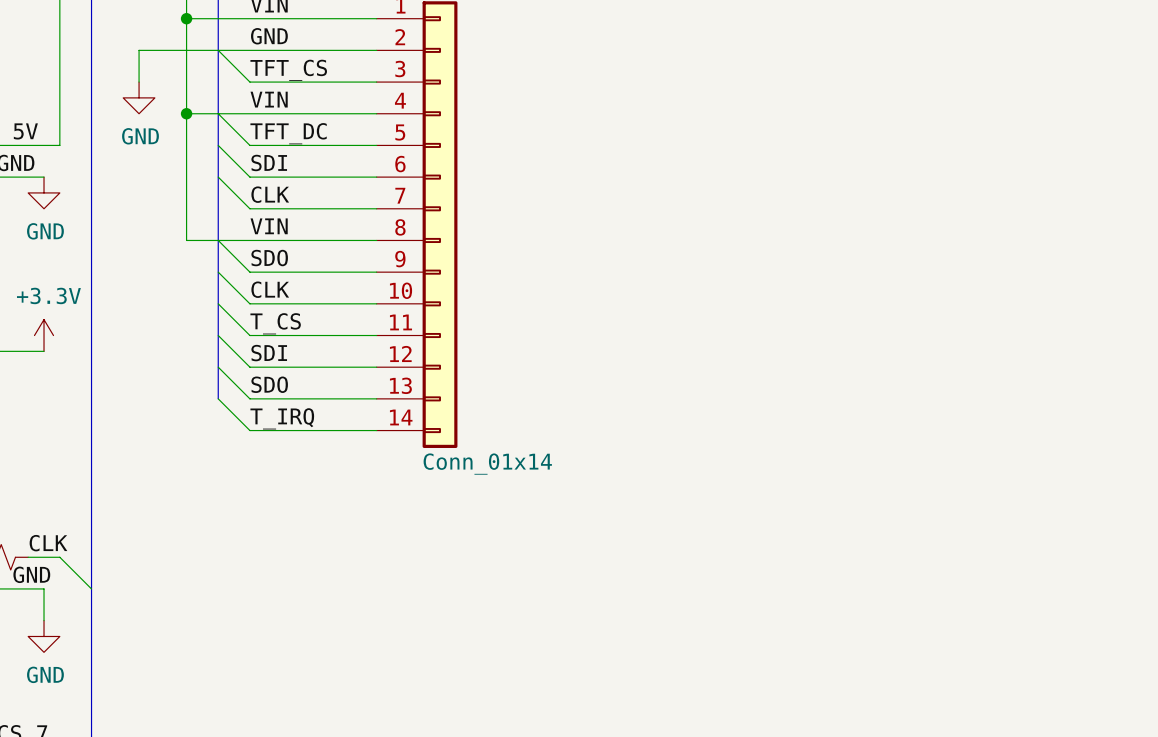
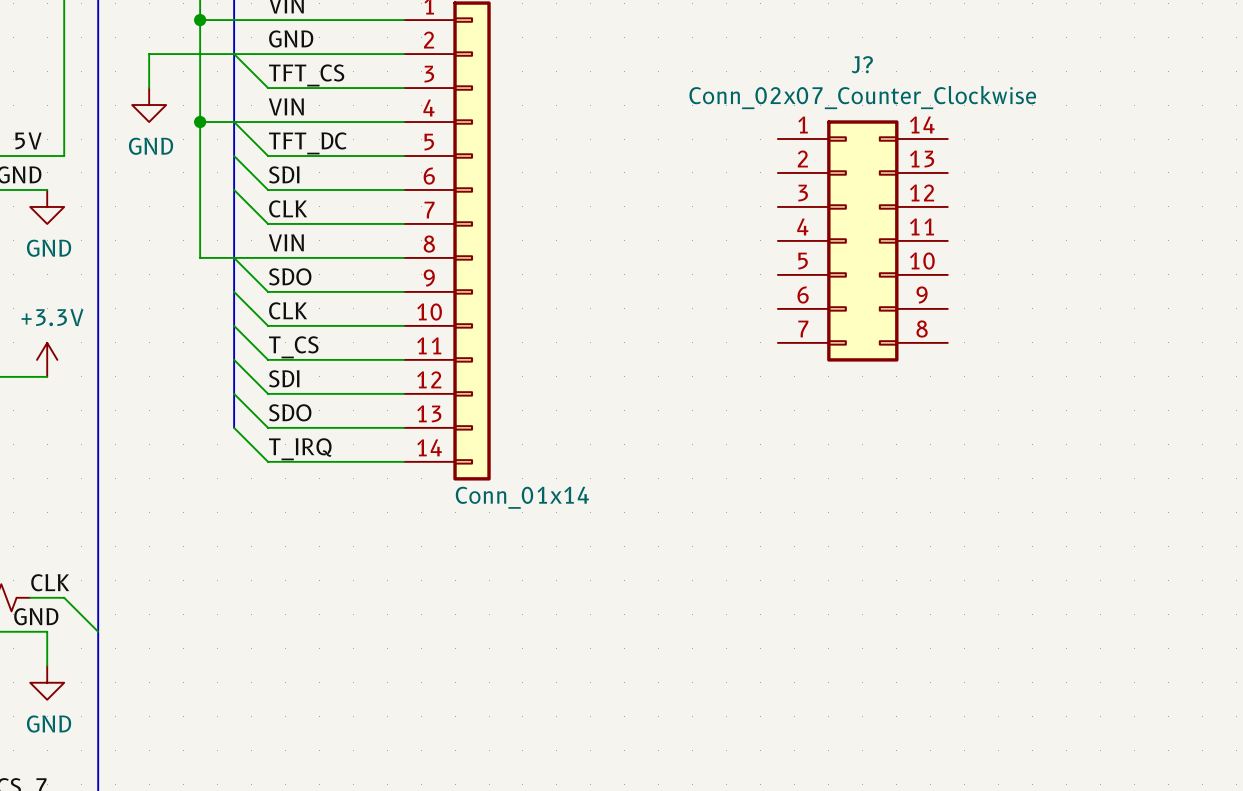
J?: none -> Conn_02x07_Counter_Clockwise (862, 240)

